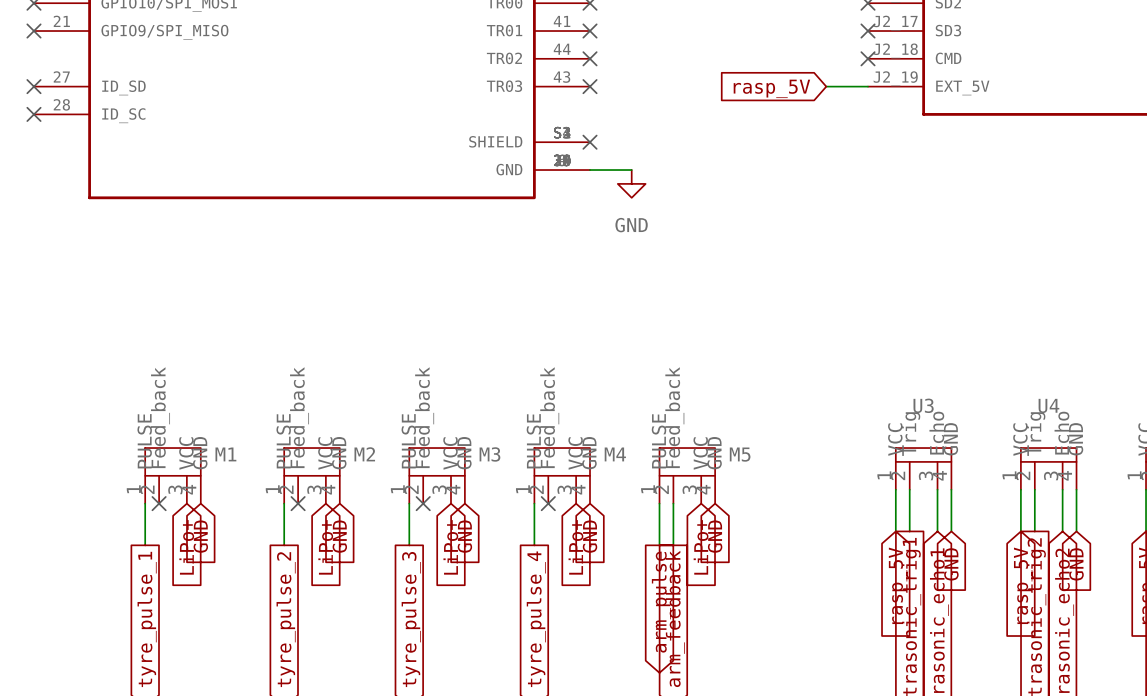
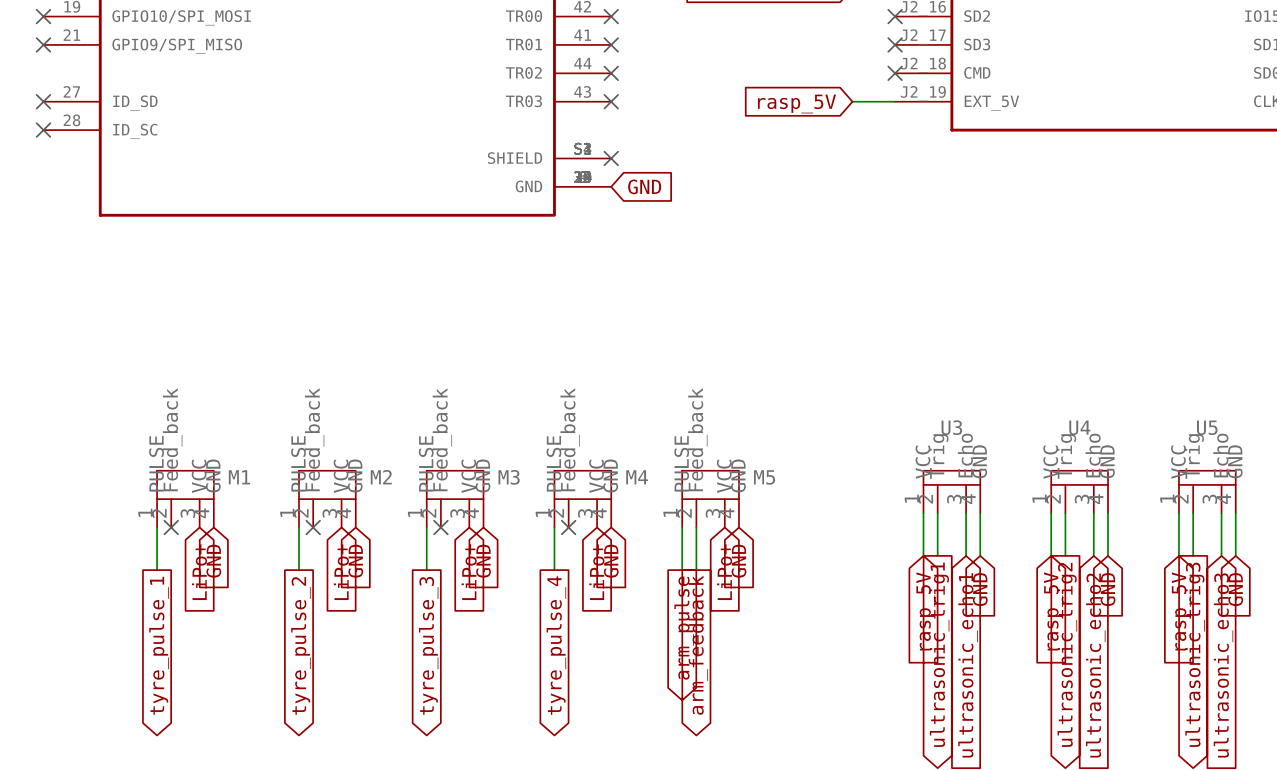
wire: (590, 170) (631, 170) -> none
global label: none -> GND (644, 186)
power symbol: GND (631, 183) -> none

